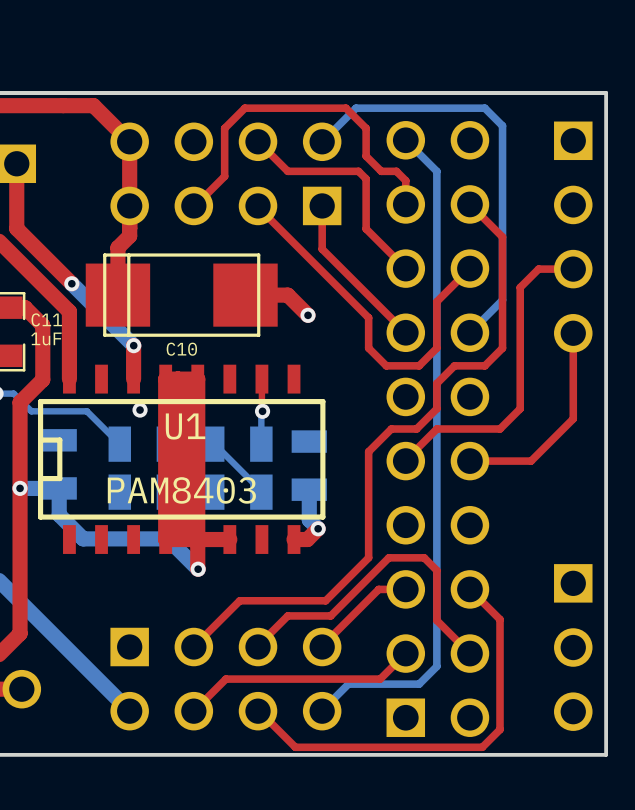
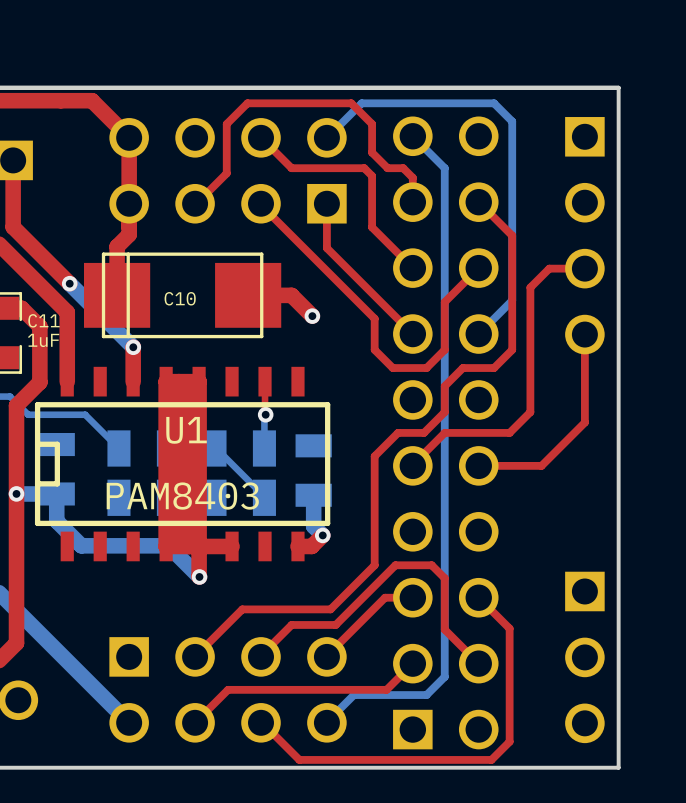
C10 name position: C10 (181, 349) -> C10 (180, 298)
via: (140, 410) -> none

